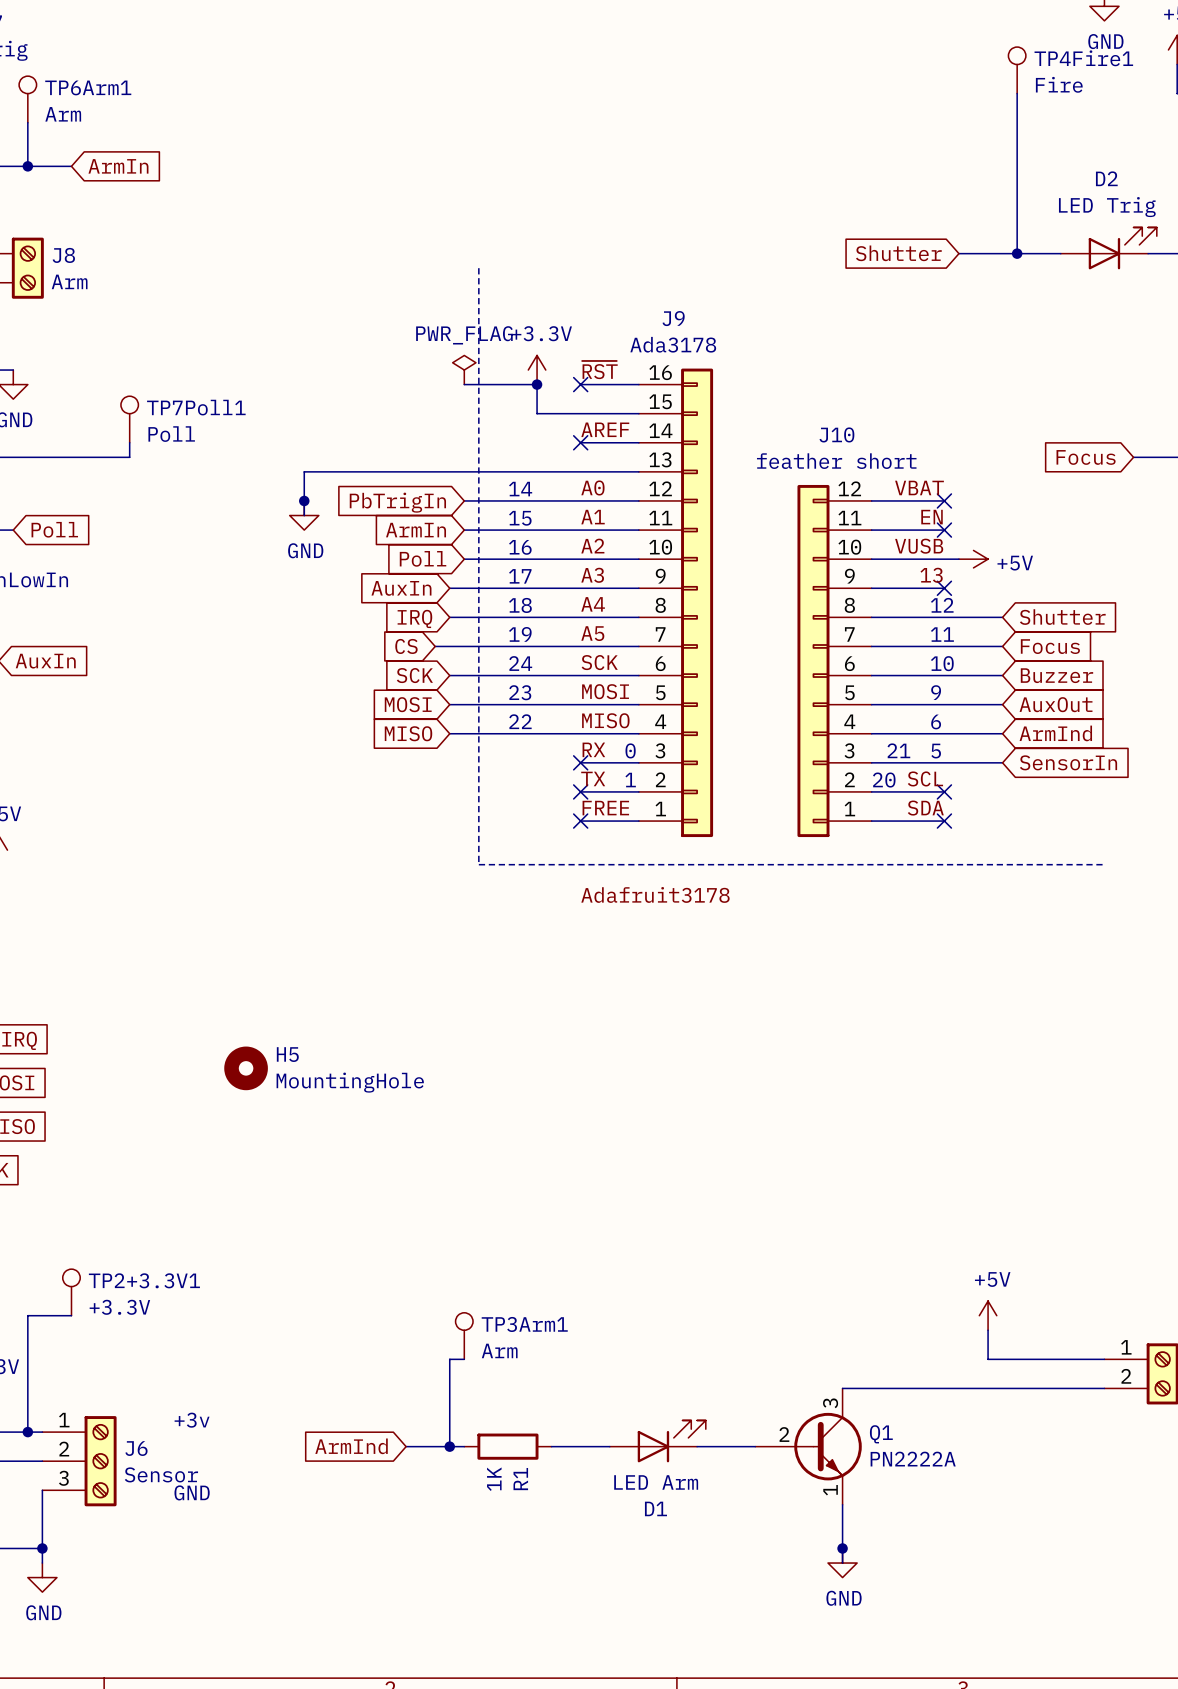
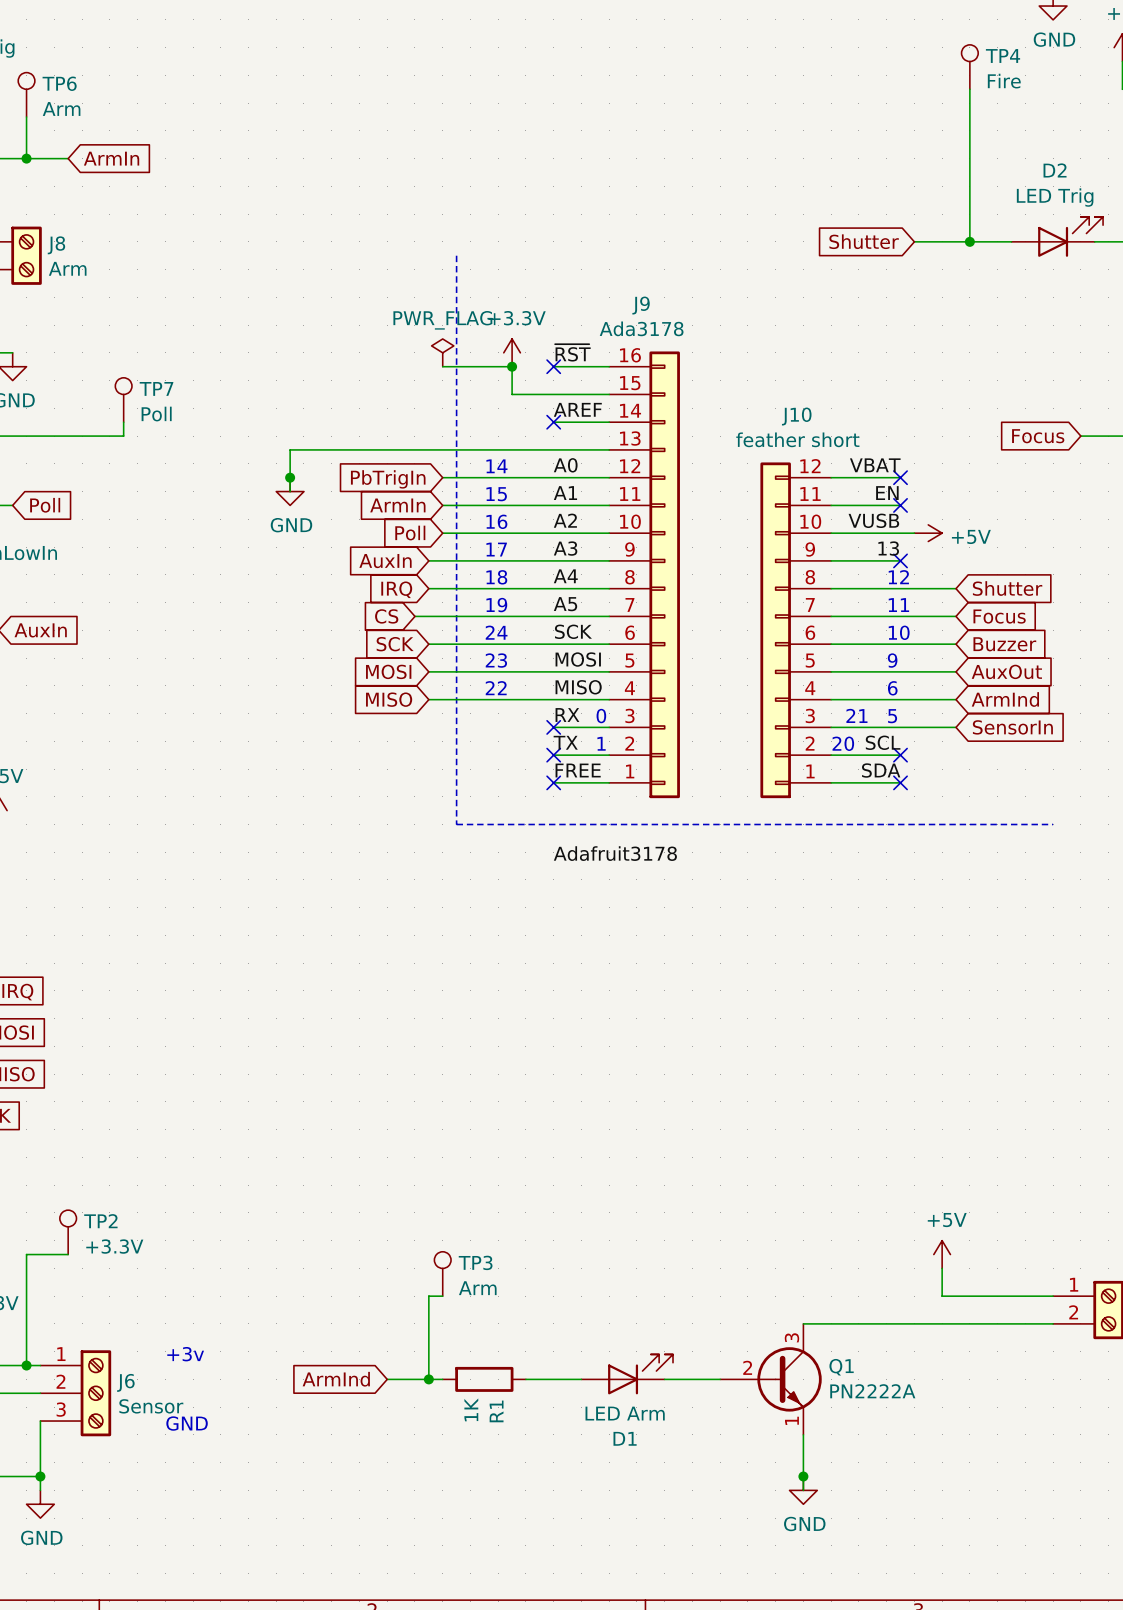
TP4Fire1 name: TP4Fire1 (1083, 58) -> TP4 (1003, 56)
TP6Arm1 name: TP6Arm1 (88, 87) -> TP6 (59, 83)
TP7Poll1 name: TP7Poll1 (196, 407) -> TP7 (156, 388)
H5: MountingHole (246, 1068) -> none
TP2+3.3V1 name: TP2+3.3V1 (144, 1280) -> TP2 (100, 1221)
TP3Arm1 name: TP3Arm1 (524, 1324) -> TP3 (475, 1262)

